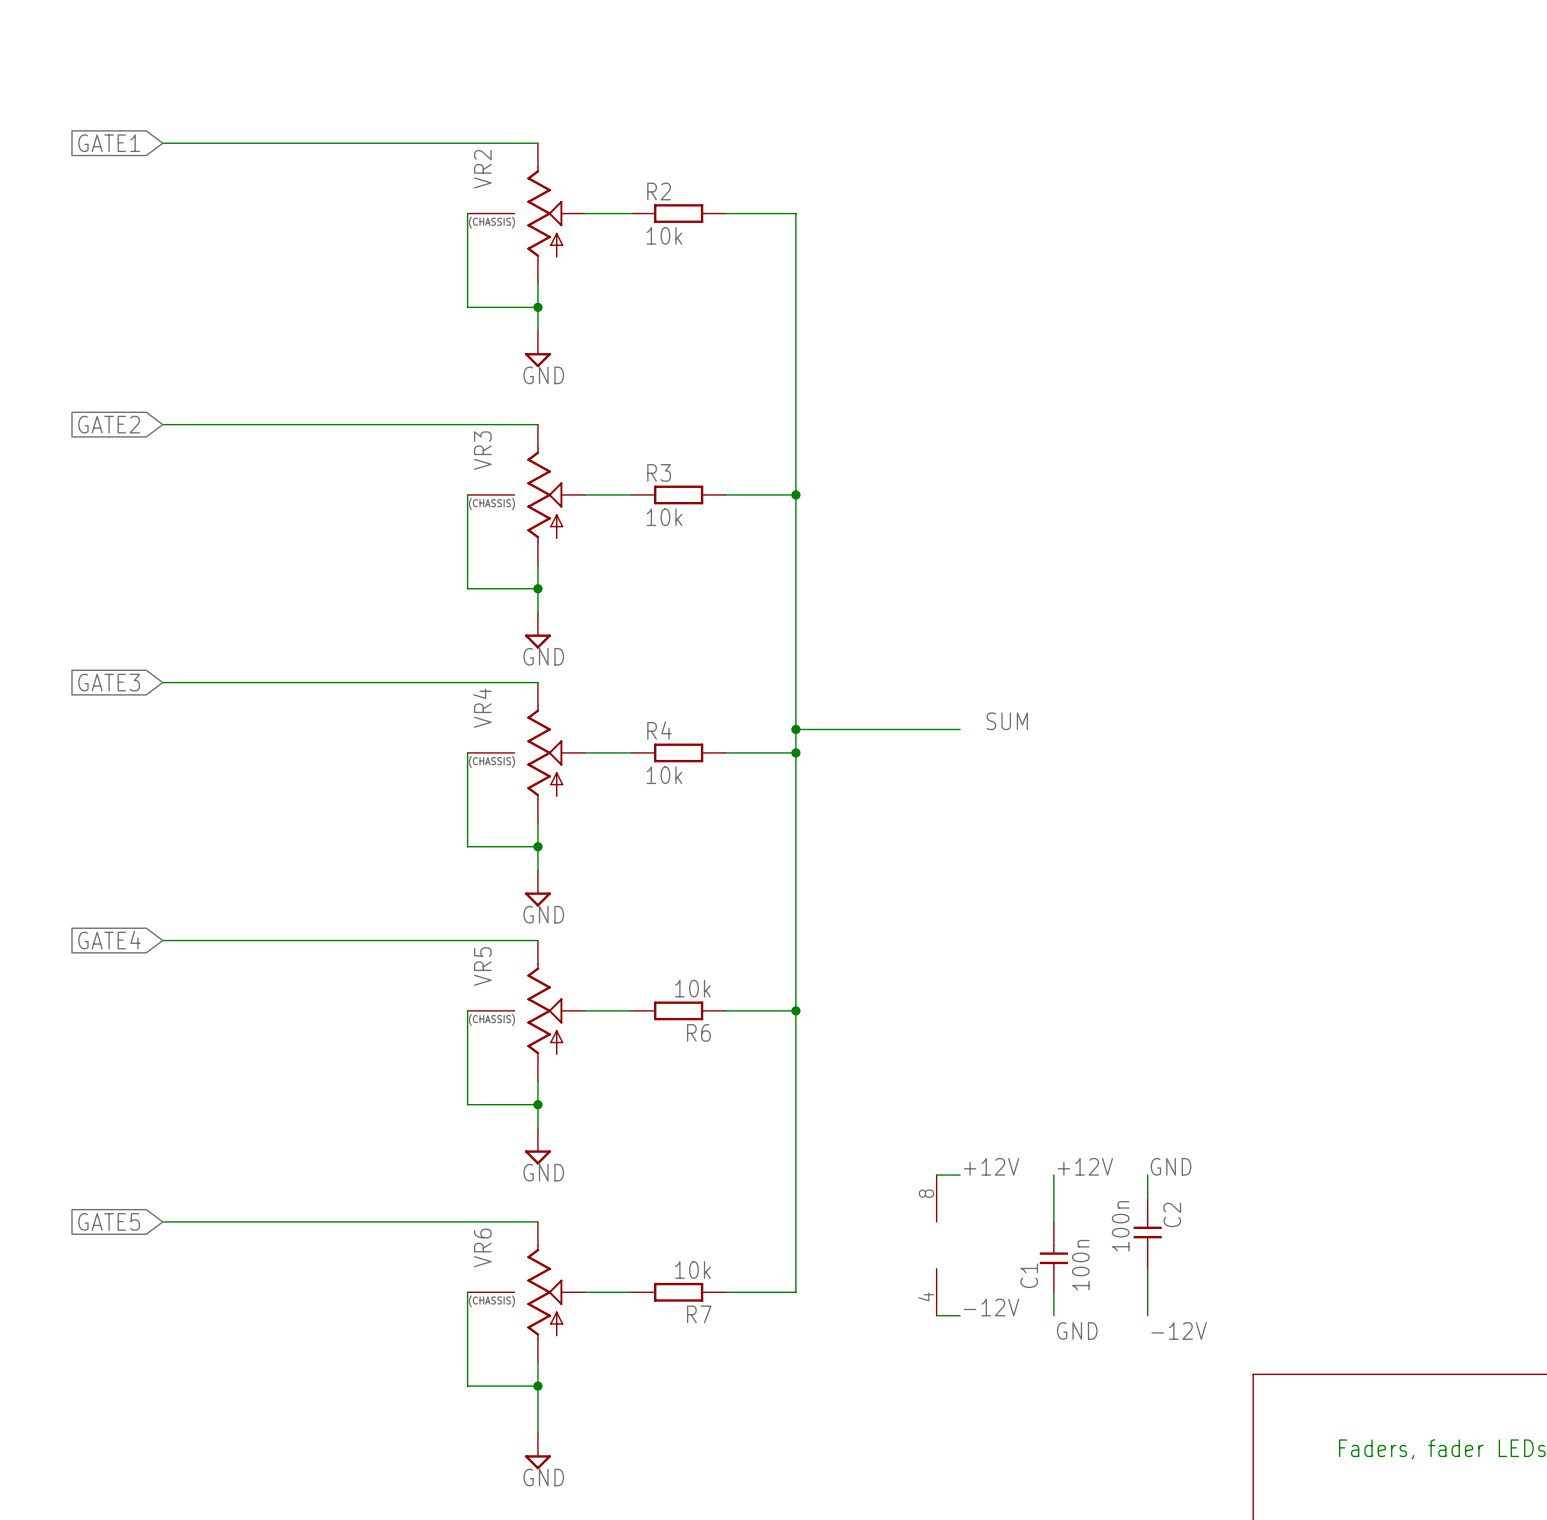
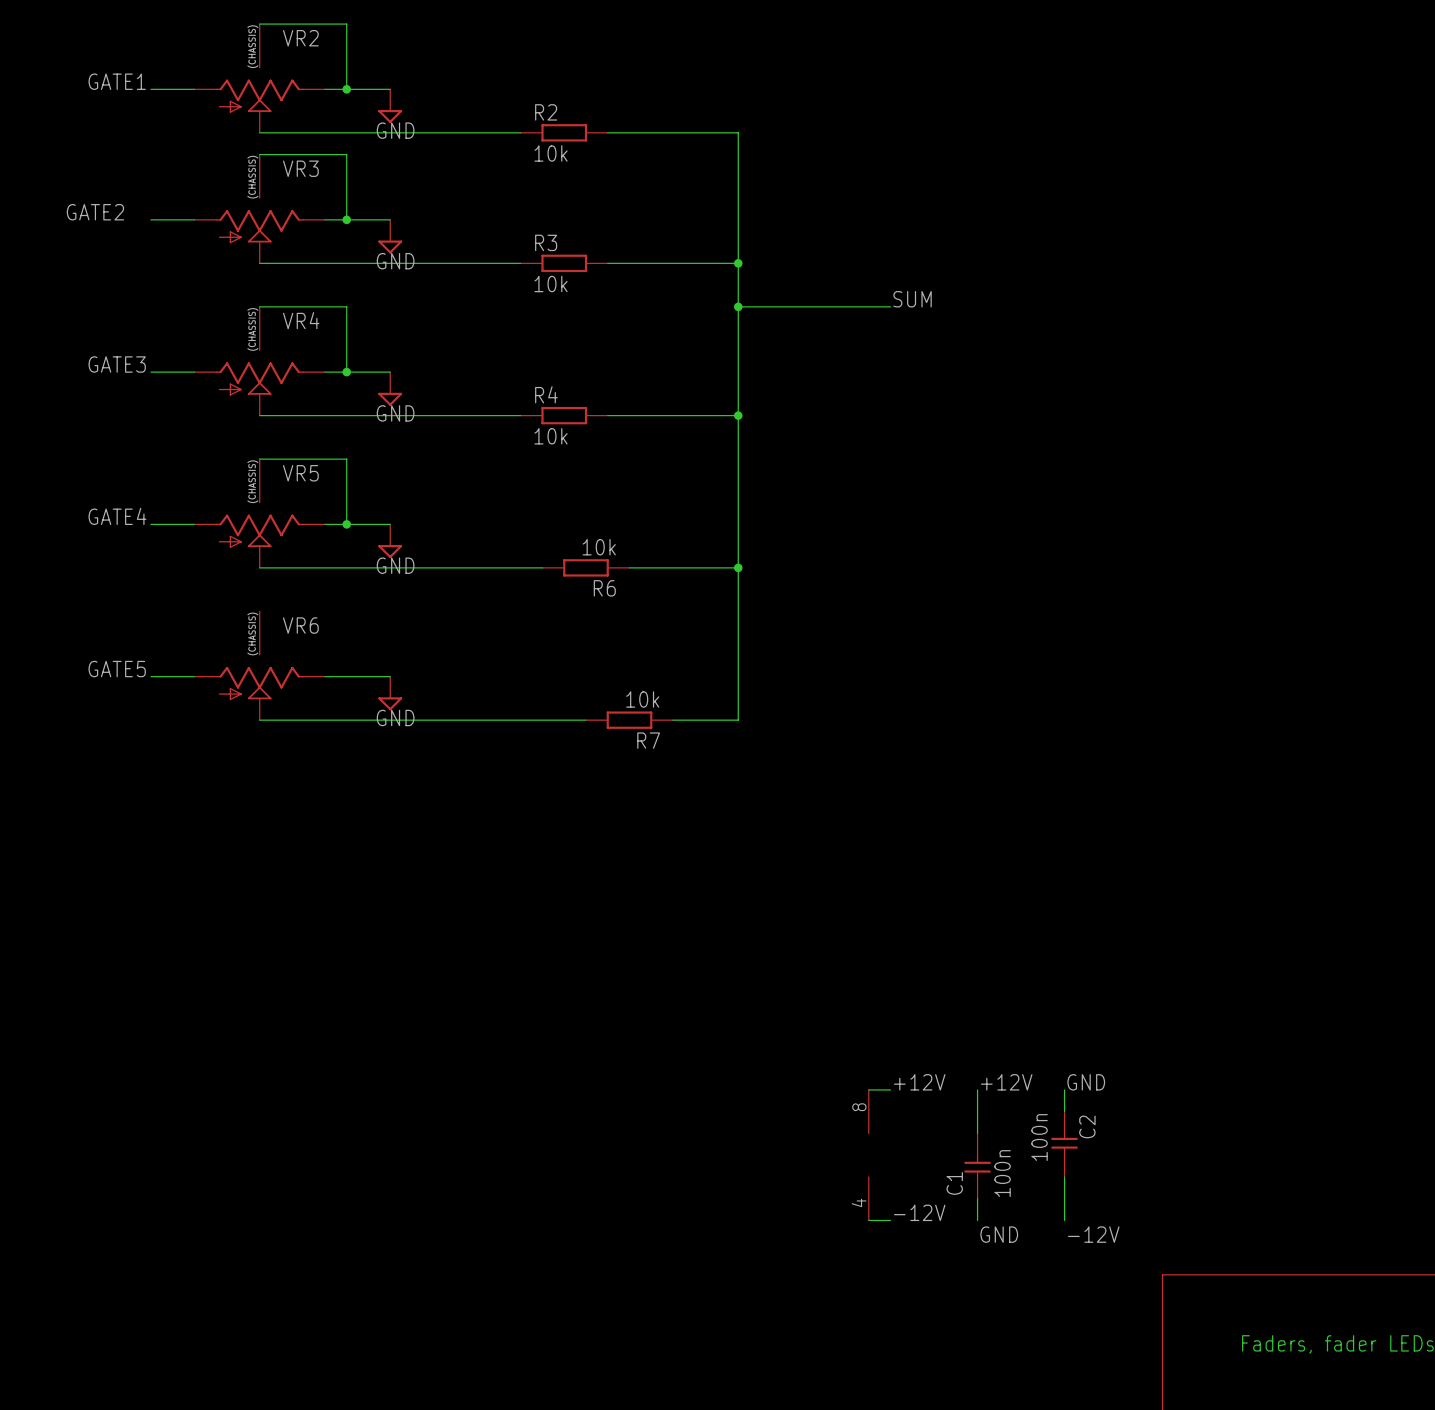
wire: none -> (259, 24) (346, 24) (346, 89)
label: none -> GATE1 (117, 81)
wire: none -> (150, 89) (194, 89)
wire: none -> (324, 89) (390, 89)
junction: none -> (346, 89)
power symbol: none -> GND (390, 106)
global label: GATE1 (109, 143) -> none
wire: (162, 143) (279, 143) -> none
VR2 symbol: [467, 143, 585, 284] -> [194, 24, 325, 133]
wire: none -> (498, 132) (520, 132)
wire: none -> (259, 154) (346, 154) (346, 219)
VR2 name position: VR2 (482, 169) -> VR2 (300, 38)
wire: (467, 213) (467, 307) (537, 307) -> none
wire: (584, 213) (631, 213) -> none
R2 position: (678, 213) -> (564, 132)
wire: (725, 213) (795, 213) -> (607, 132) (738, 132) (738, 198)
label: none -> GATE2 (95, 212)
wire: none -> (150, 219) (194, 219)
wire: none -> (324, 219) (390, 219)
junction: none -> (346, 219)
power symbol: none -> GND (390, 236)
wire: none -> (259, 263) (520, 263)
wire: (537, 283) (537, 330) -> none
wire: none -> (607, 263) (738, 263)
junction: none -> (738, 263)
junction: (537, 307) -> none
label: none -> SUM (912, 299)
wire: none -> (259, 306) (346, 306) (346, 372)
wire: none -> (738, 306) (890, 306)
junction: none -> (738, 306)
power symbol: GND (537, 348) -> none
label: none -> GATE3 (117, 364)
wire: none -> (150, 372) (194, 372)
wire: none -> (324, 372) (390, 372)
junction: none -> (346, 372)
power symbol: none -> GND (390, 388)
global label: GATE2 (109, 424) -> none
wire: (162, 424) (537, 424) -> none
VR3 symbol: [467, 424, 585, 566] -> [194, 154, 325, 264]
wire: none -> (259, 415) (520, 415)
wire: none -> (607, 415) (738, 415)
VR3 name position: VR3 (482, 450) -> VR3 (300, 168)
wire: none -> (259, 459) (346, 459) (346, 524)
wire: (467, 494) (467, 588) (537, 588) -> none
wire: (584, 494) (631, 494) -> none
R3 position: (678, 494) -> (564, 263)
wire: (725, 494) (795, 494) -> none
junction position: (795, 494) -> (738, 415)
label: none -> GATE4 (117, 516)
wire: none -> (150, 524) (194, 524)
wire: none -> (324, 524) (390, 524)
junction: none -> (346, 524)
wire: (537, 565) (537, 612) -> none
power symbol: none -> GND (390, 541)
junction: (537, 588) -> none
wire: none -> (259, 567) (542, 567)
wire: none -> (629, 567) (738, 567)
junction: none -> (738, 567)
power symbol: GND (537, 630) -> none
global label: GATE3 (109, 682) -> none
wire: (162, 682) (537, 682) -> none
VR4 symbol: [467, 682, 585, 824] -> [194, 306, 325, 416]
VR4 name position: VR4 (482, 708) -> VR4 (301, 320)
label: none -> GATE5 (117, 669)
label: SUM (1007, 721) -> none
wire: none -> (150, 676) (194, 676)
wire: none -> (324, 676) (390, 676)
wire: (795, 729) (960, 729) -> none
junction: (795, 729) -> none
power symbol: none -> GND (390, 693)
wire: (467, 752) (467, 846) (537, 846) -> none
wire: (584, 752) (631, 752) -> none
R4 position: (678, 752) -> (564, 415)
wire: (725, 752) (795, 752) -> none
junction: (795, 752) -> none
wire: none -> (259, 720) (586, 720)
wire: (795, 776) (795, 1292) (725, 1292) -> (738, 720) (673, 720)
wire: (537, 823) (537, 870) -> none
junction: (537, 846) -> none
power symbol: GND (537, 888) -> none
global label: GATE4 (109, 940) -> none
wire: (162, 940) (537, 940) -> none
VR5 symbol: [467, 940, 585, 1082] -> [194, 459, 325, 568]
VR5 name position: VR5 (482, 966) -> VR5 (300, 473)
wire: (467, 1010) (467, 1104) (537, 1104) -> none
wire: (584, 1010) (631, 1010) -> none
R6 position: (678, 1010) -> (586, 567)
wire: (725, 1010) (795, 1010) -> none
junction: (795, 1010) -> none
wire: (537, 1081) (537, 1128) -> none
junction: (537, 1104) -> none
power symbol: GND (537, 1146) -> none
global label: GATE5 (109, 1221) -> none
wire: (162, 1221) (537, 1221) -> none
VR6 symbol: [467, 1221, 585, 1363] -> [194, 611, 325, 721]
VR6 name position: VR6 (482, 1247) -> VR6 (300, 625)
wire: (467, 1292) (467, 1386) (537, 1386) -> none
wire: (584, 1292) (631, 1292) -> none
R7 position: (678, 1292) -> (629, 720)
wire: (537, 1362) (537, 1432) -> none
junction: (537, 1386) -> none
power symbol: GND (537, 1451) -> none

